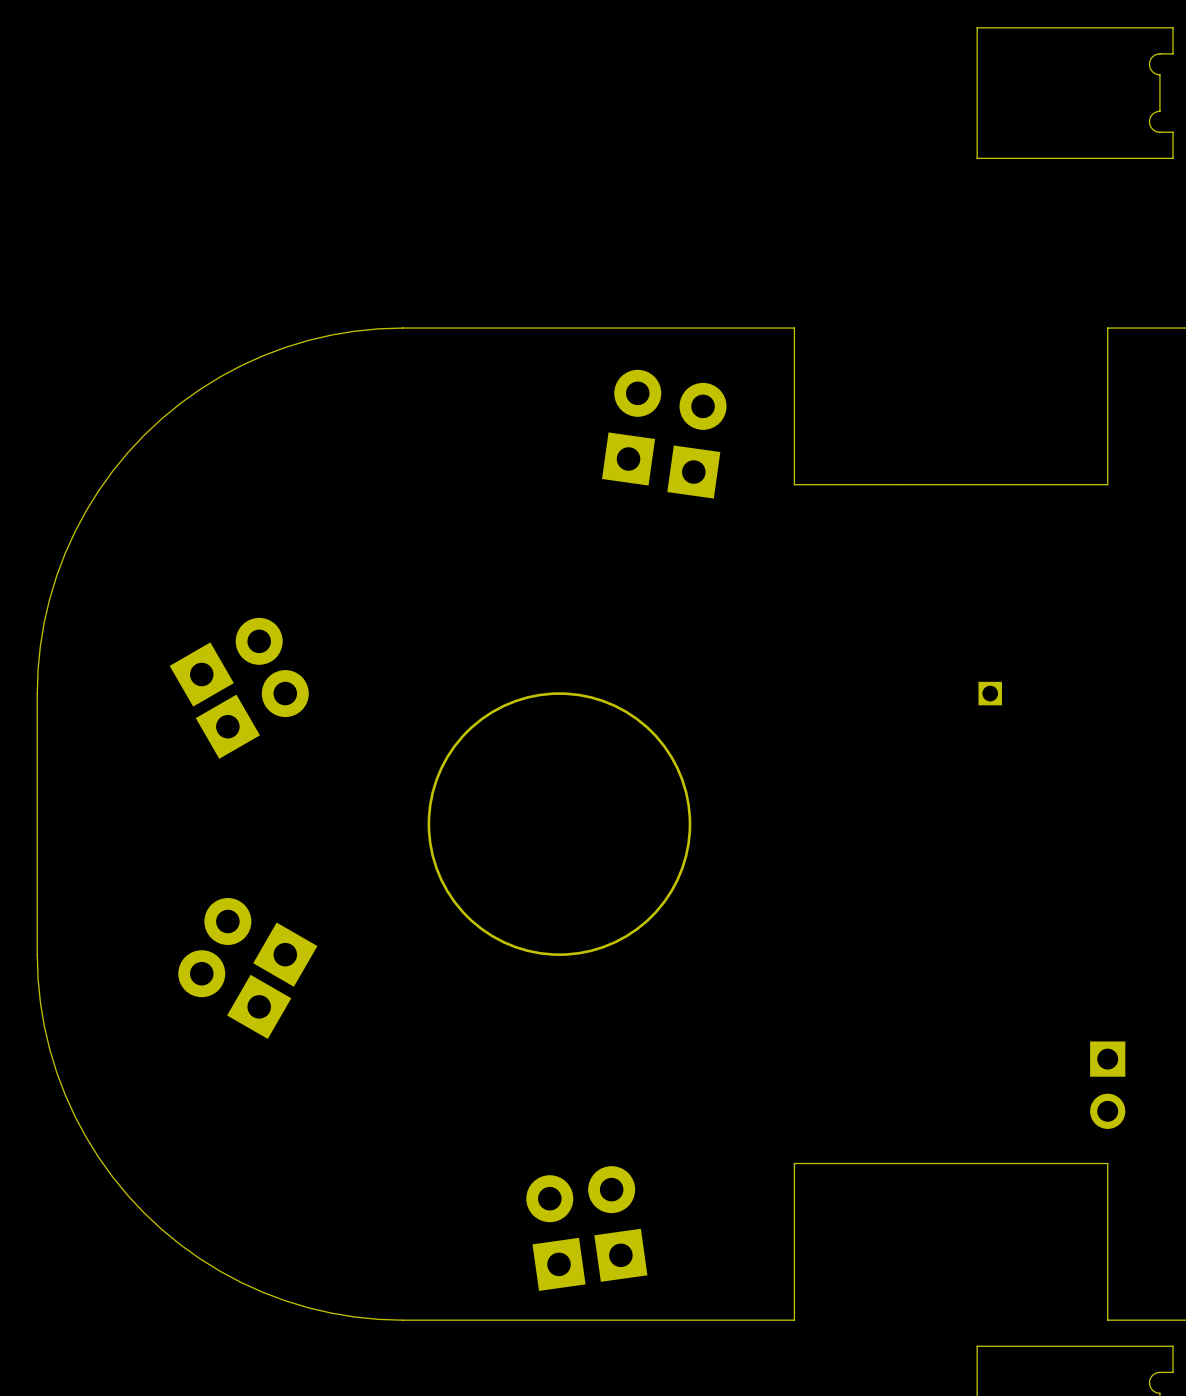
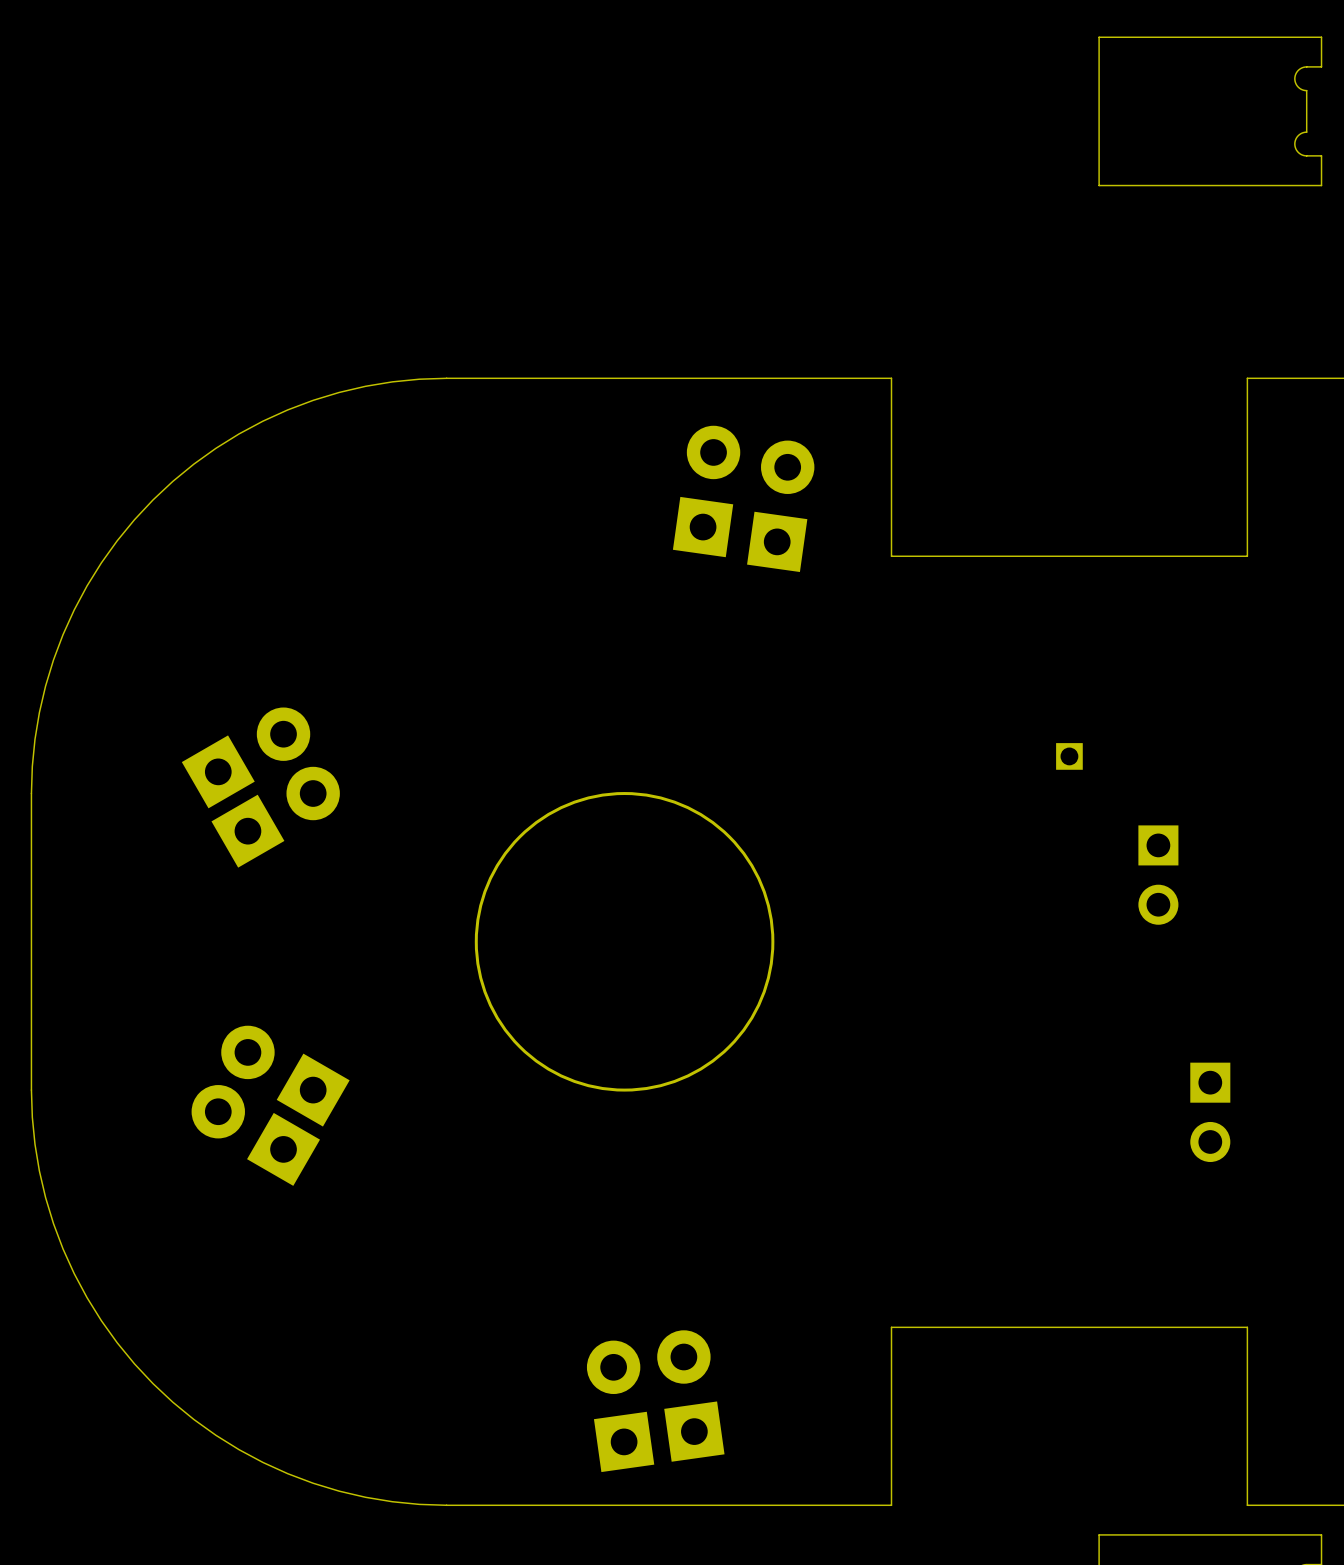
part position: (990, 693) -> (1069, 756)
part: none -> (1158, 875)
part position: (1107, 1085) -> (1210, 1112)

